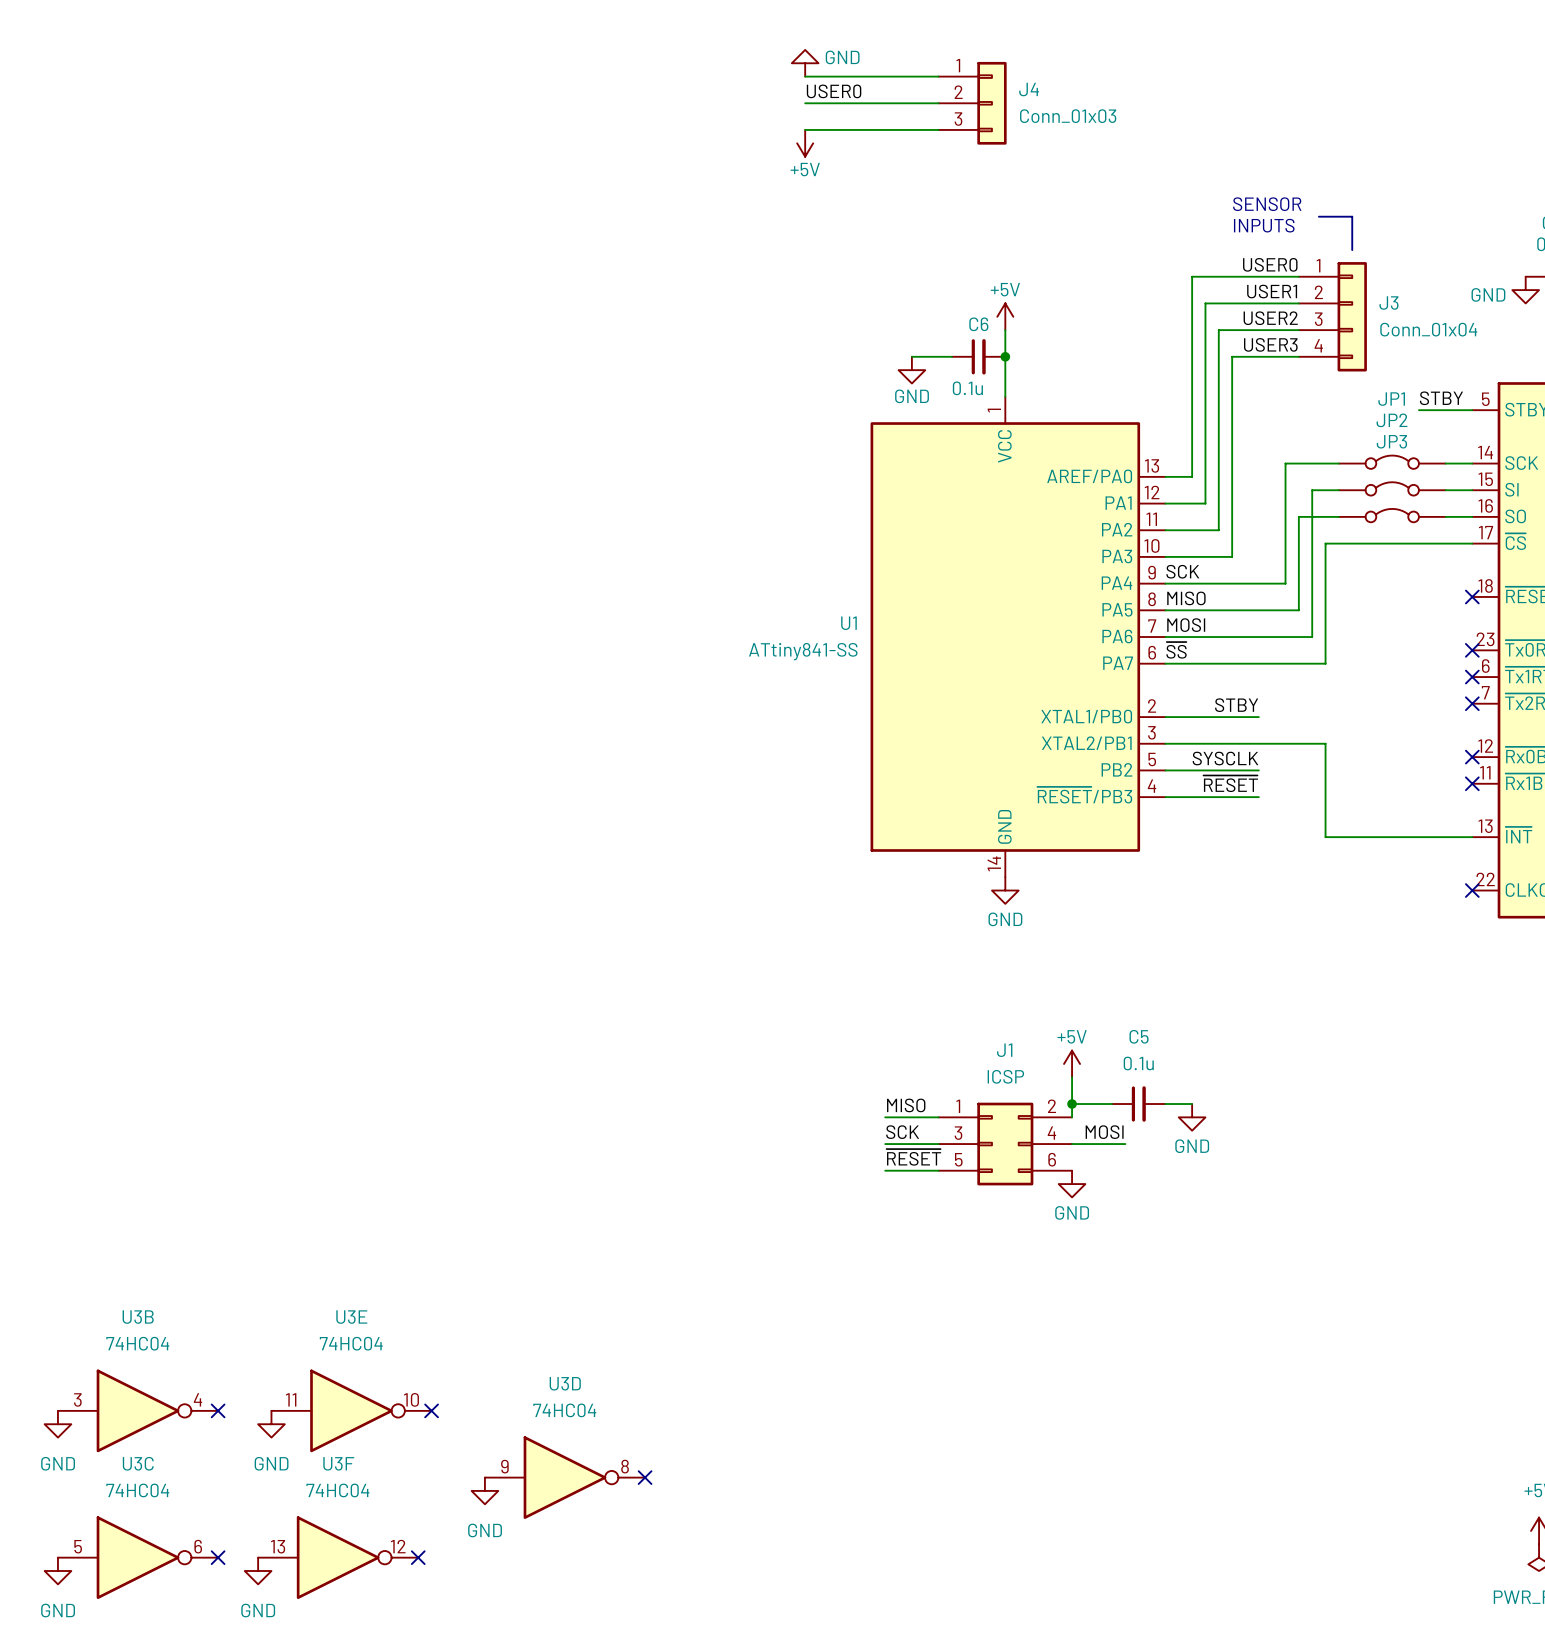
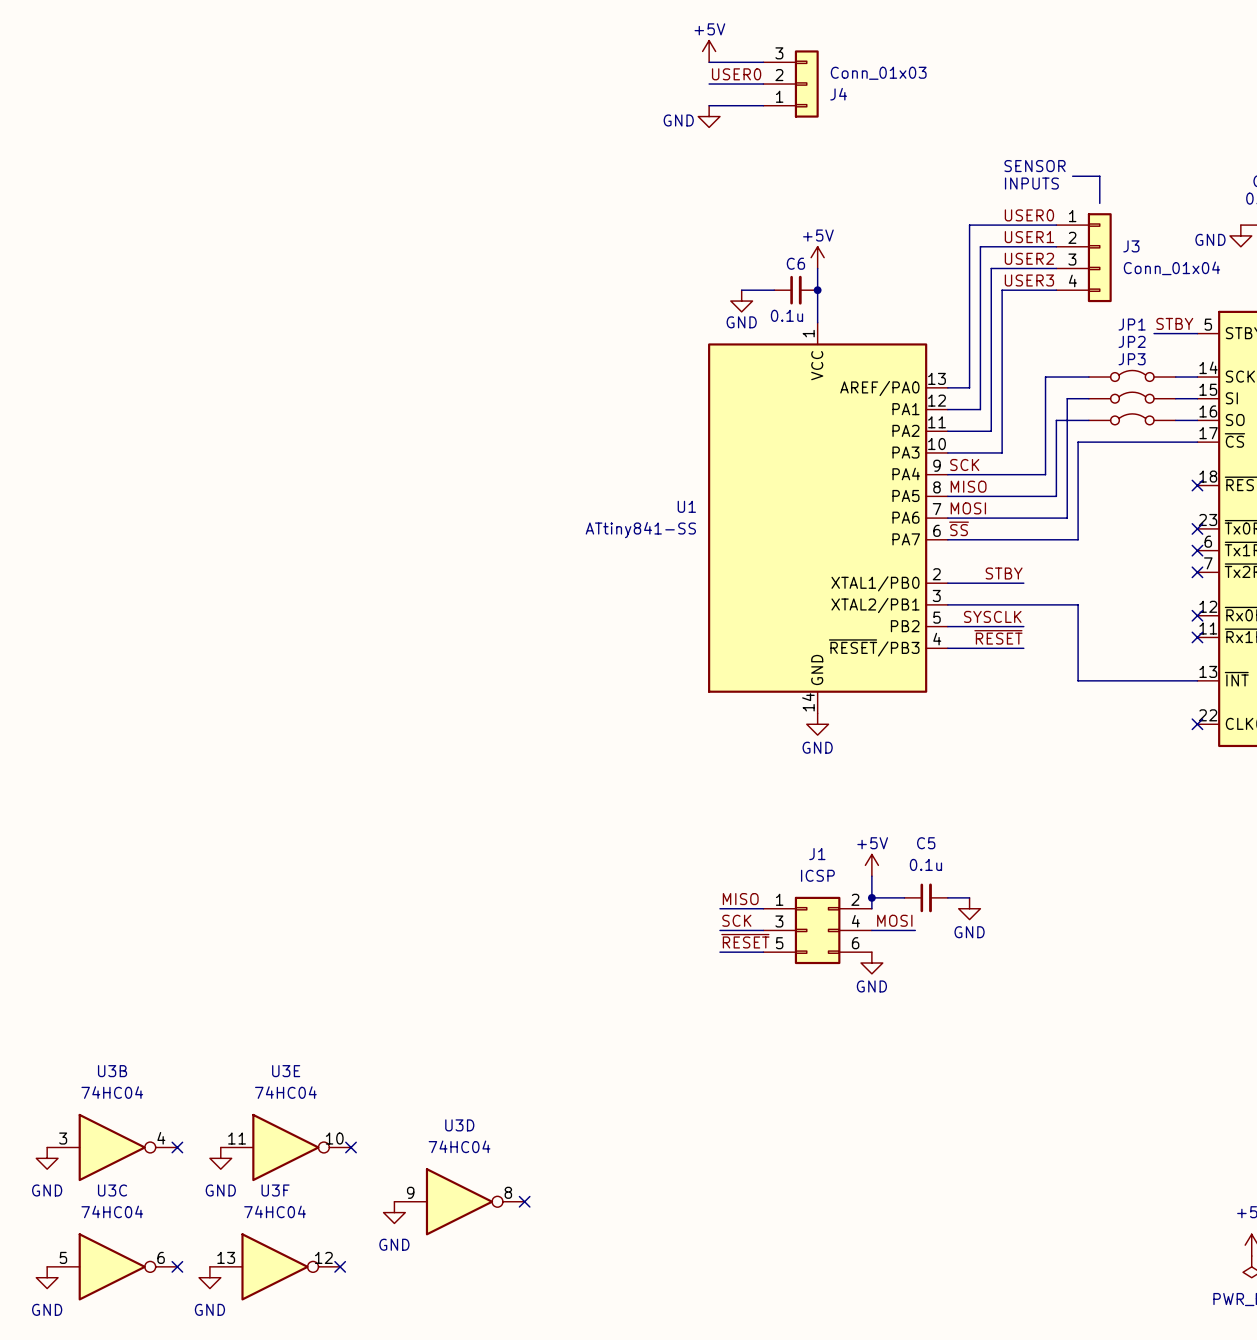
power symbol rotation: 0° (805, 63) -> 180° (709, 116)
power symbol position: GND (805, 63) -> GND (709, 116)
wire: (805, 76) (871, 76) -> none
label position: USER0 (834, 91) -> USER0 (736, 74)
wire: (805, 103) (871, 103) -> none
J4 flip: as is (991, 103) -> up-down (806, 84)
wire: (805, 129) (871, 129) -> none
power symbol rotation: 0° (805, 143) -> 180° (709, 51)
power symbol position: +5V (805, 143) -> +5V (709, 51)

